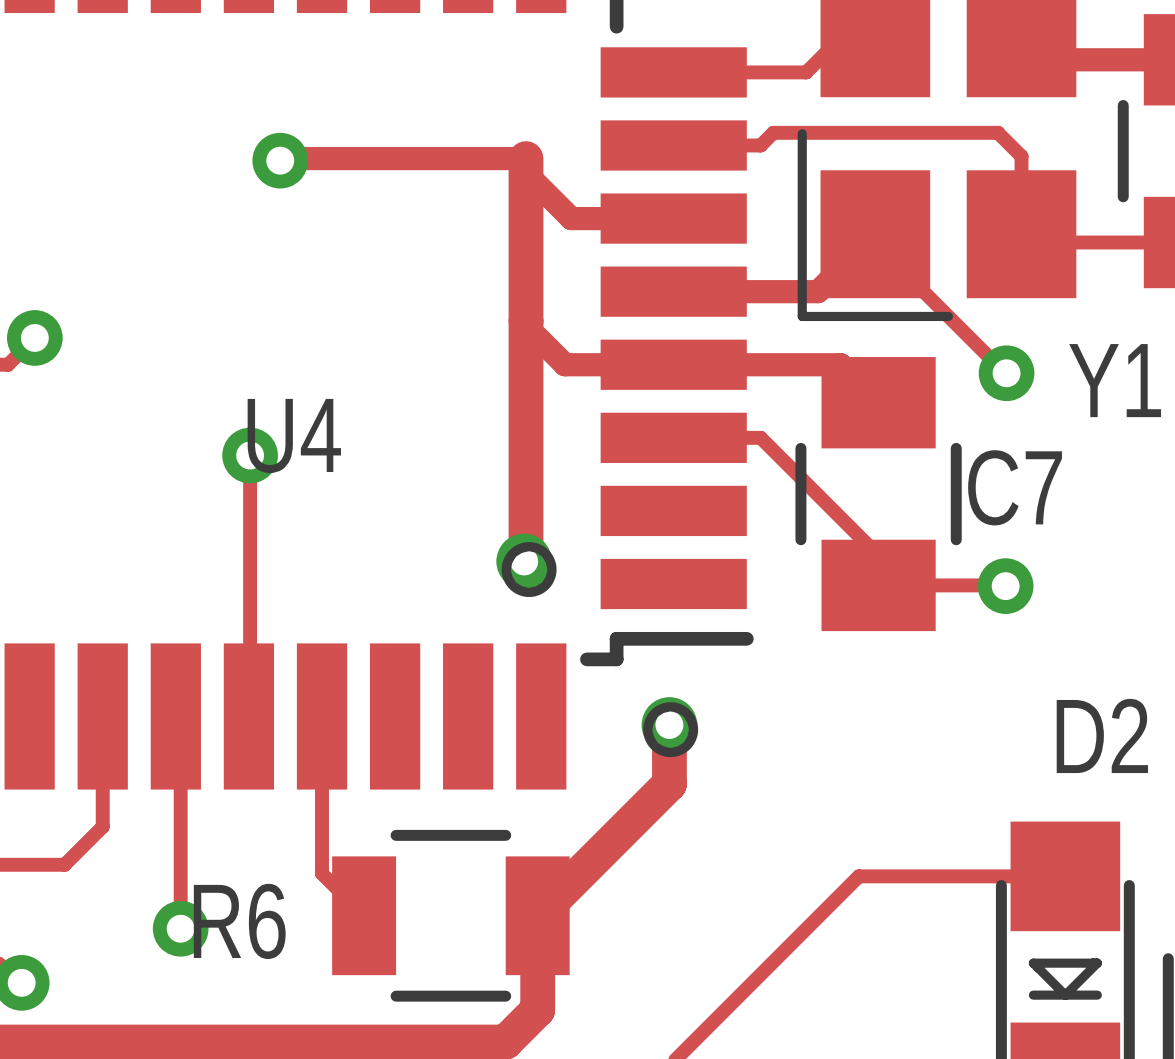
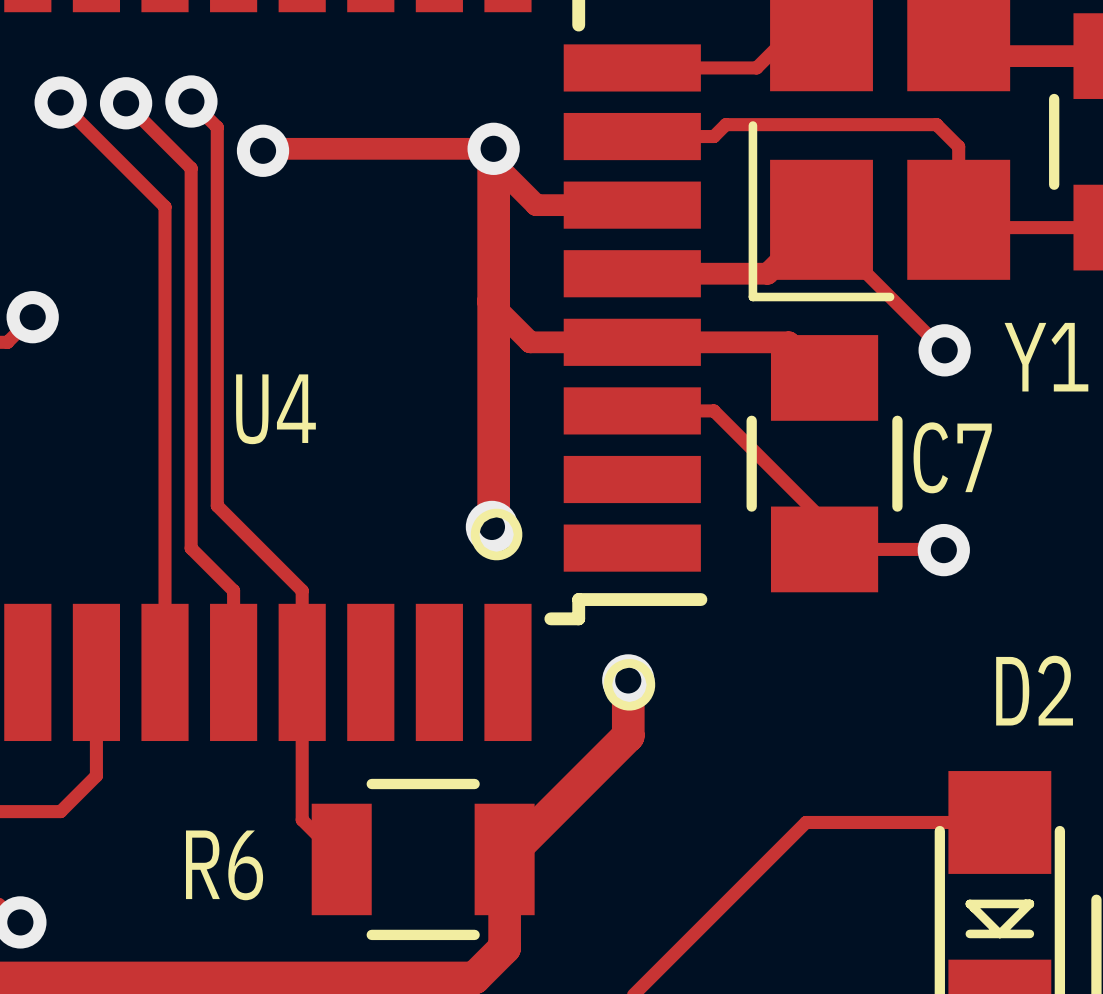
track: none -> (191, 101) (217, 127) (217, 505) (302, 590) (302, 672)
via: none -> (191, 101)
via: none -> (60, 102)
via: none -> (126, 103)
via: none -> (493, 148)
track: (250, 455) (250, 715) -> (126, 103) (191, 168) (191, 548) (233, 590) (233, 672)
via: (250, 455) -> none
track: (175, 716) (180, 721) (180, 928) -> (165, 672) (165, 206) (60, 102)
via: (180, 928) -> none

